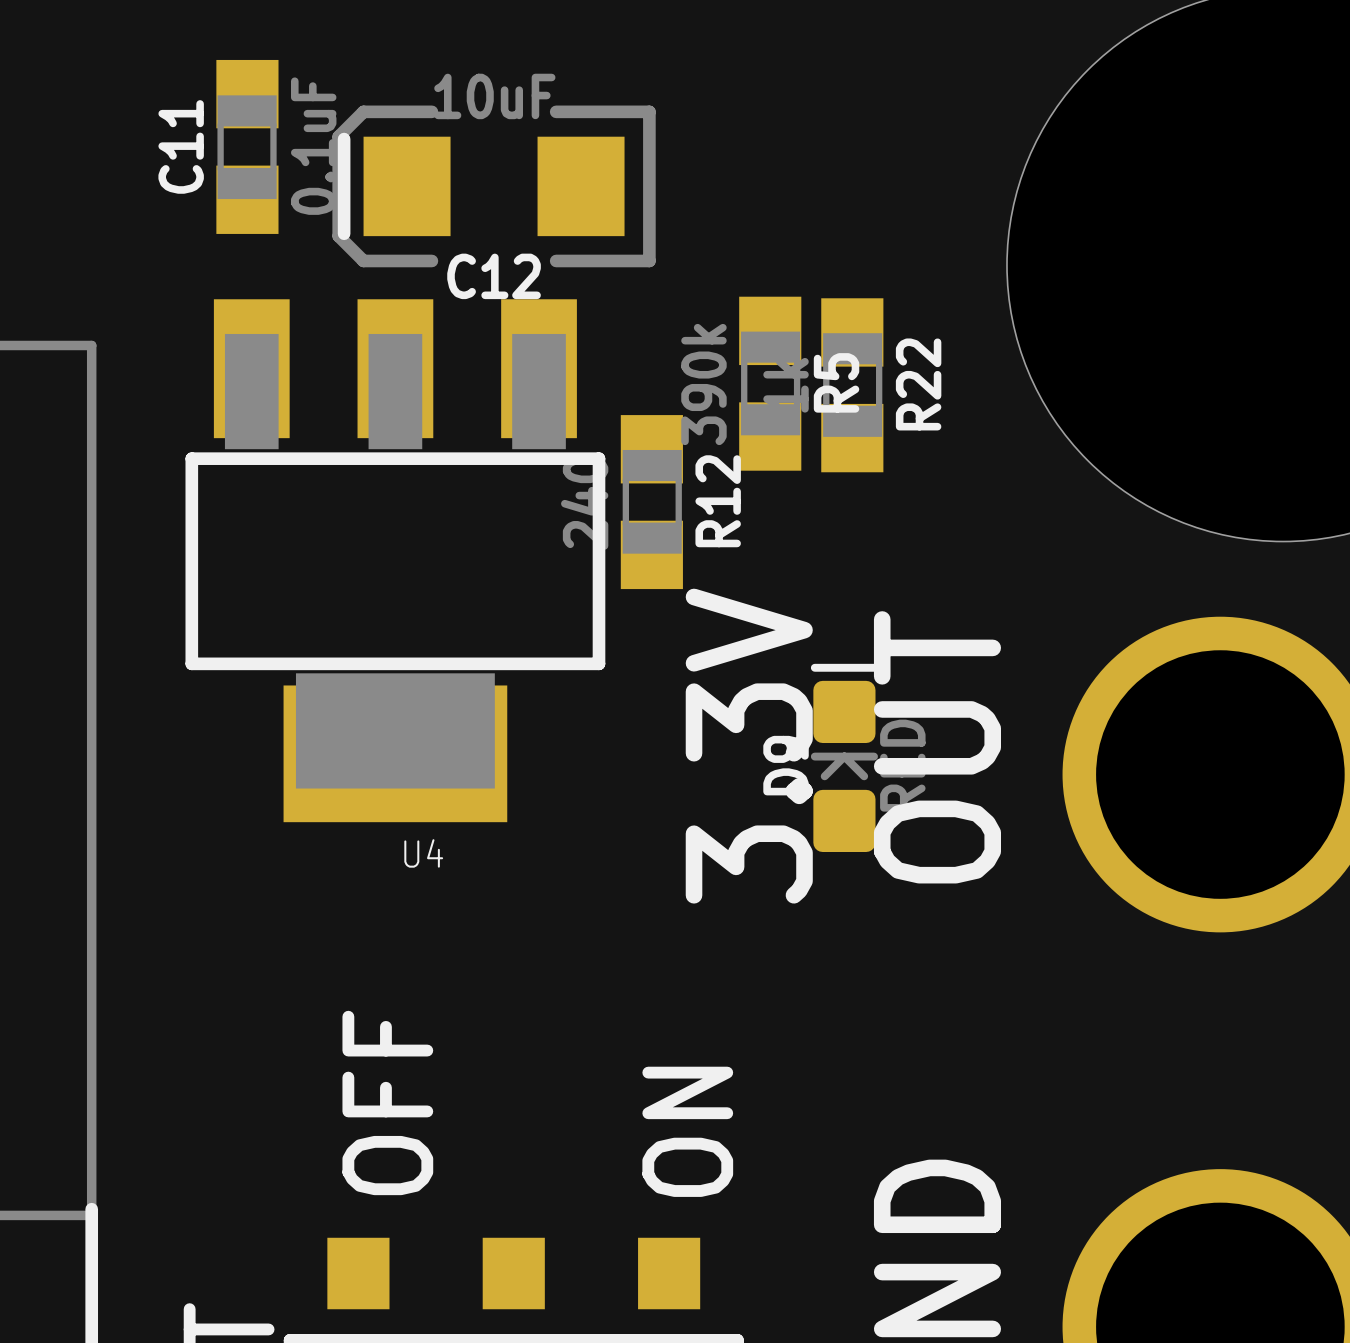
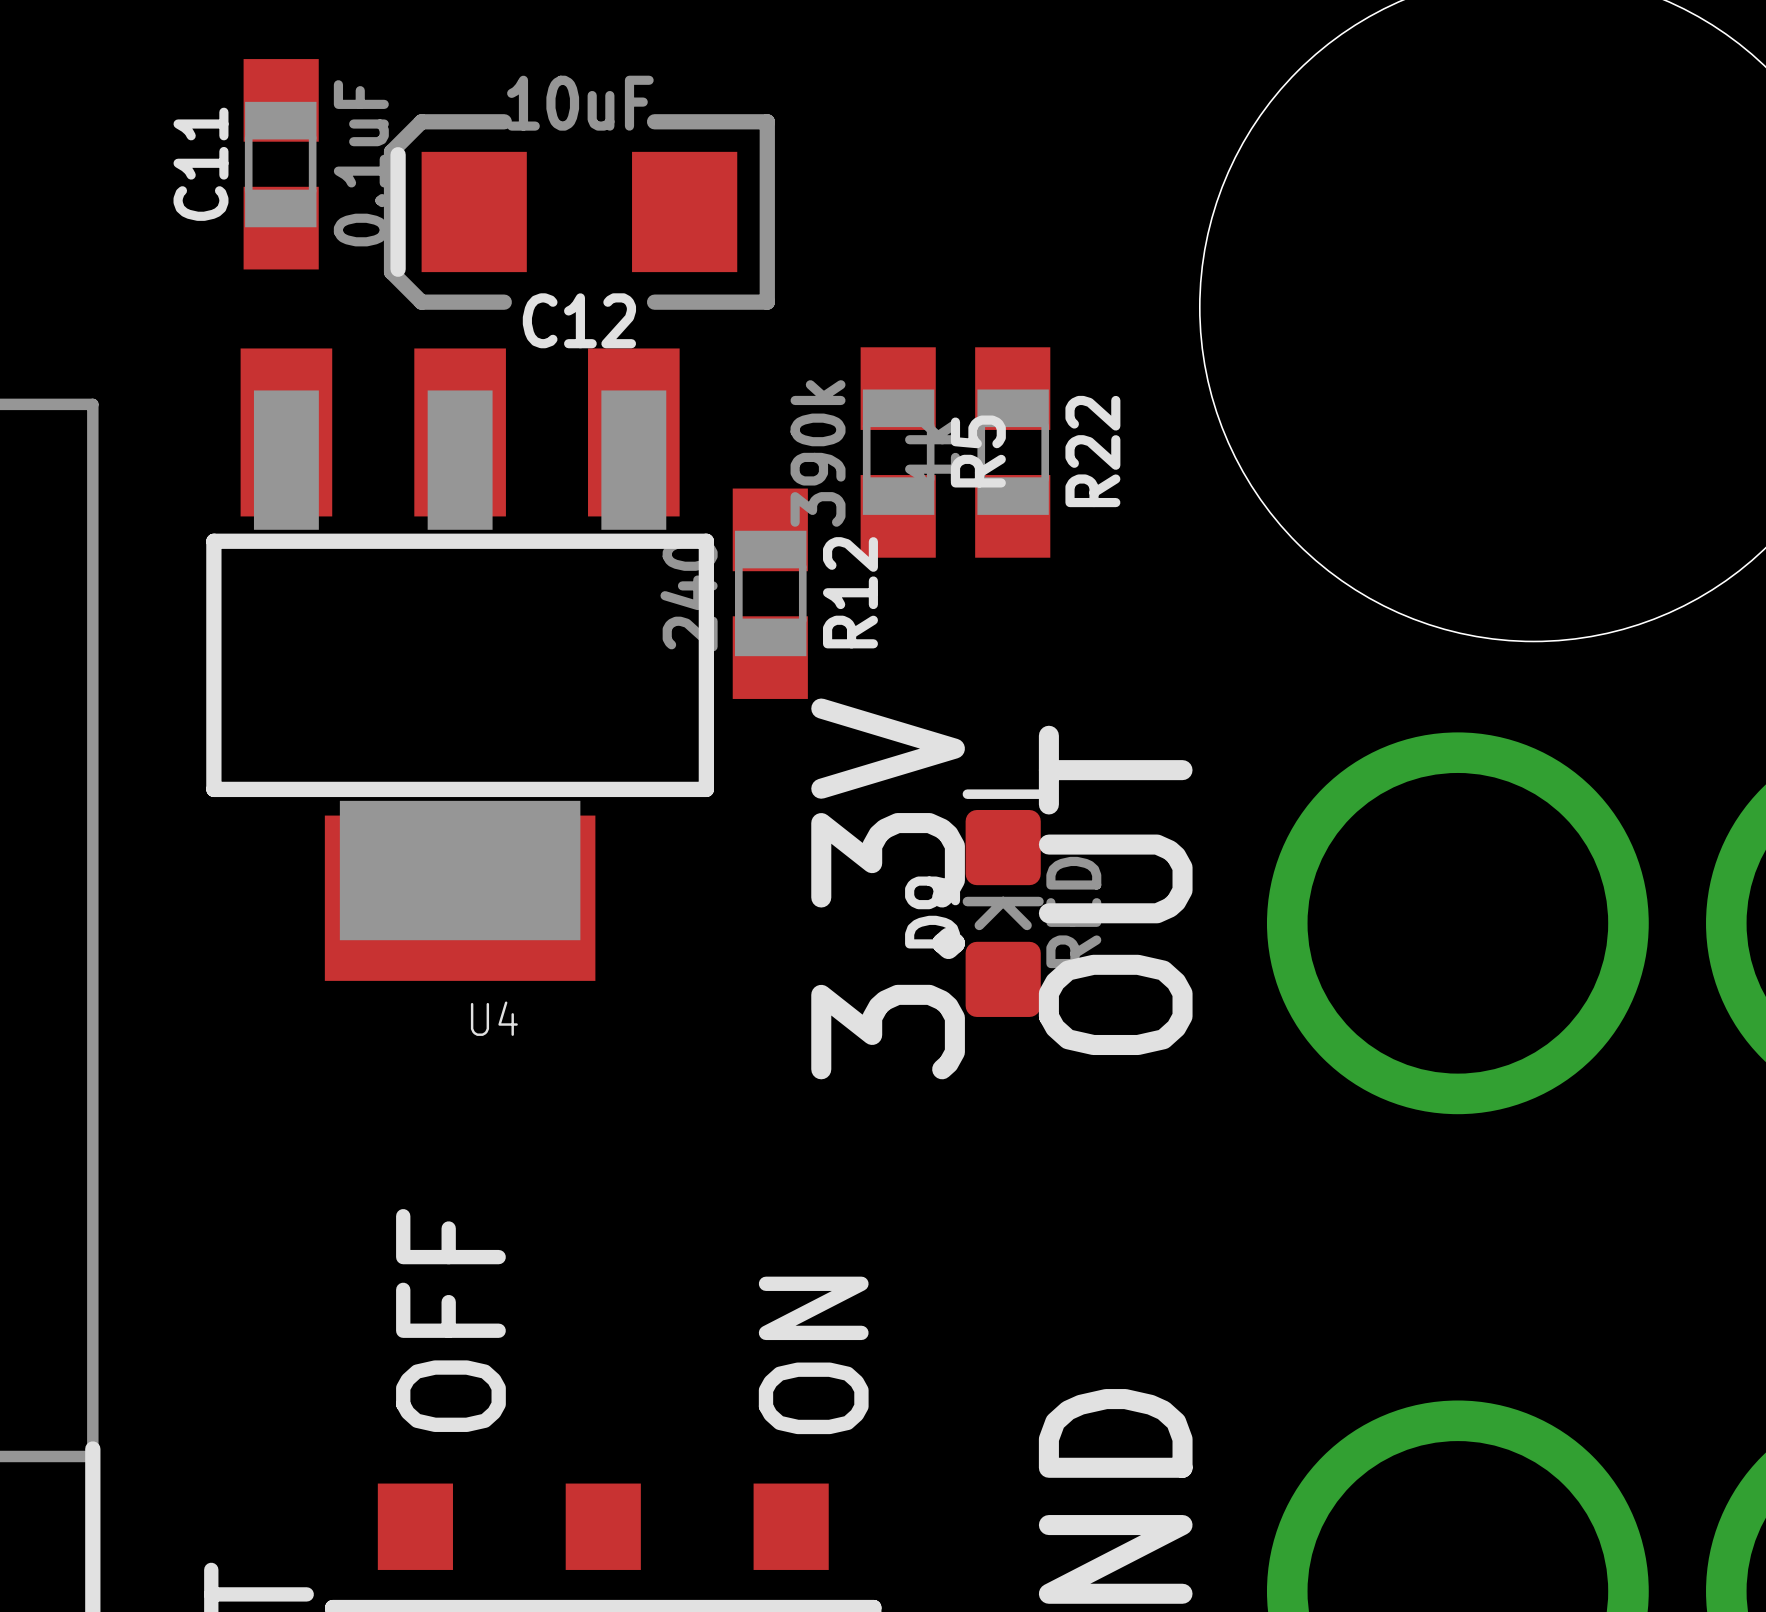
R5 position: (770, 383) -> (898, 452)

